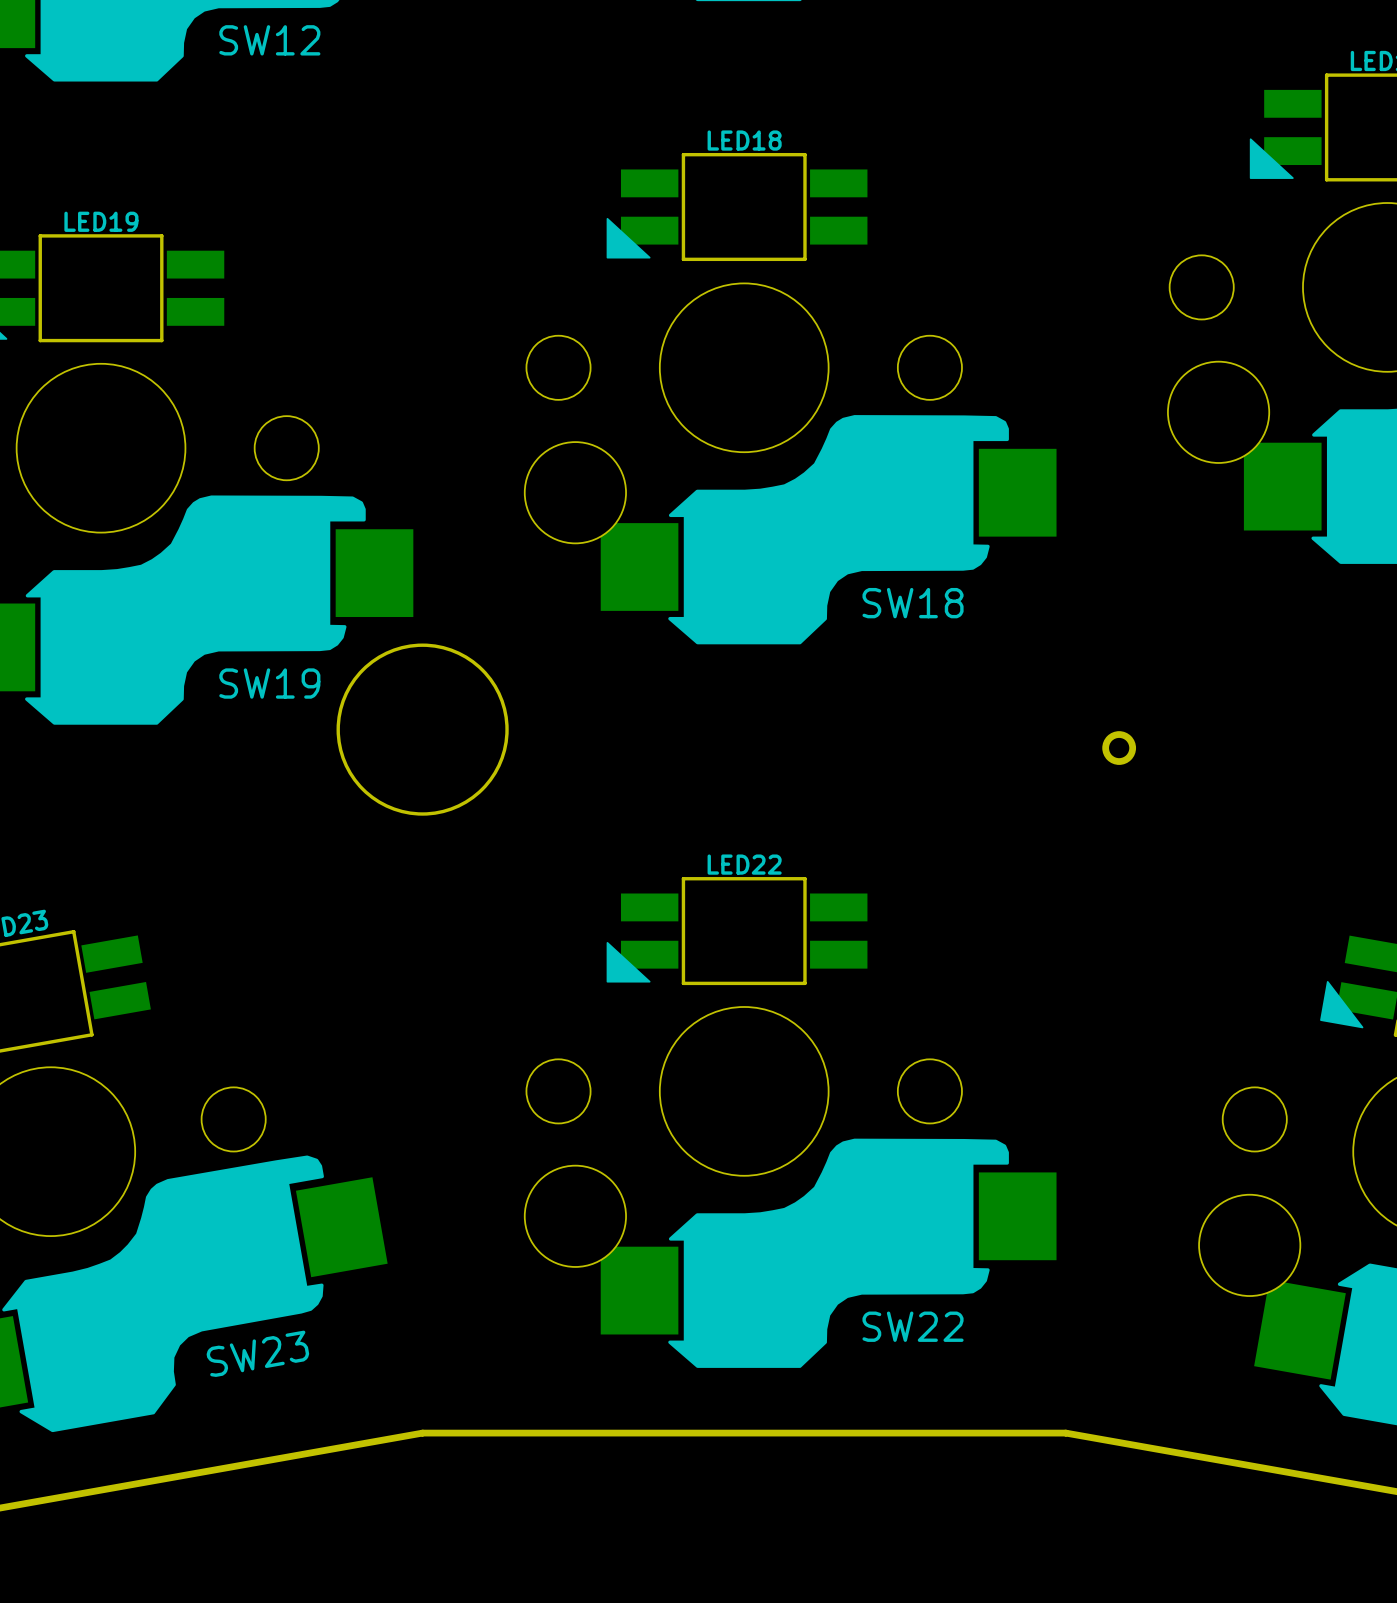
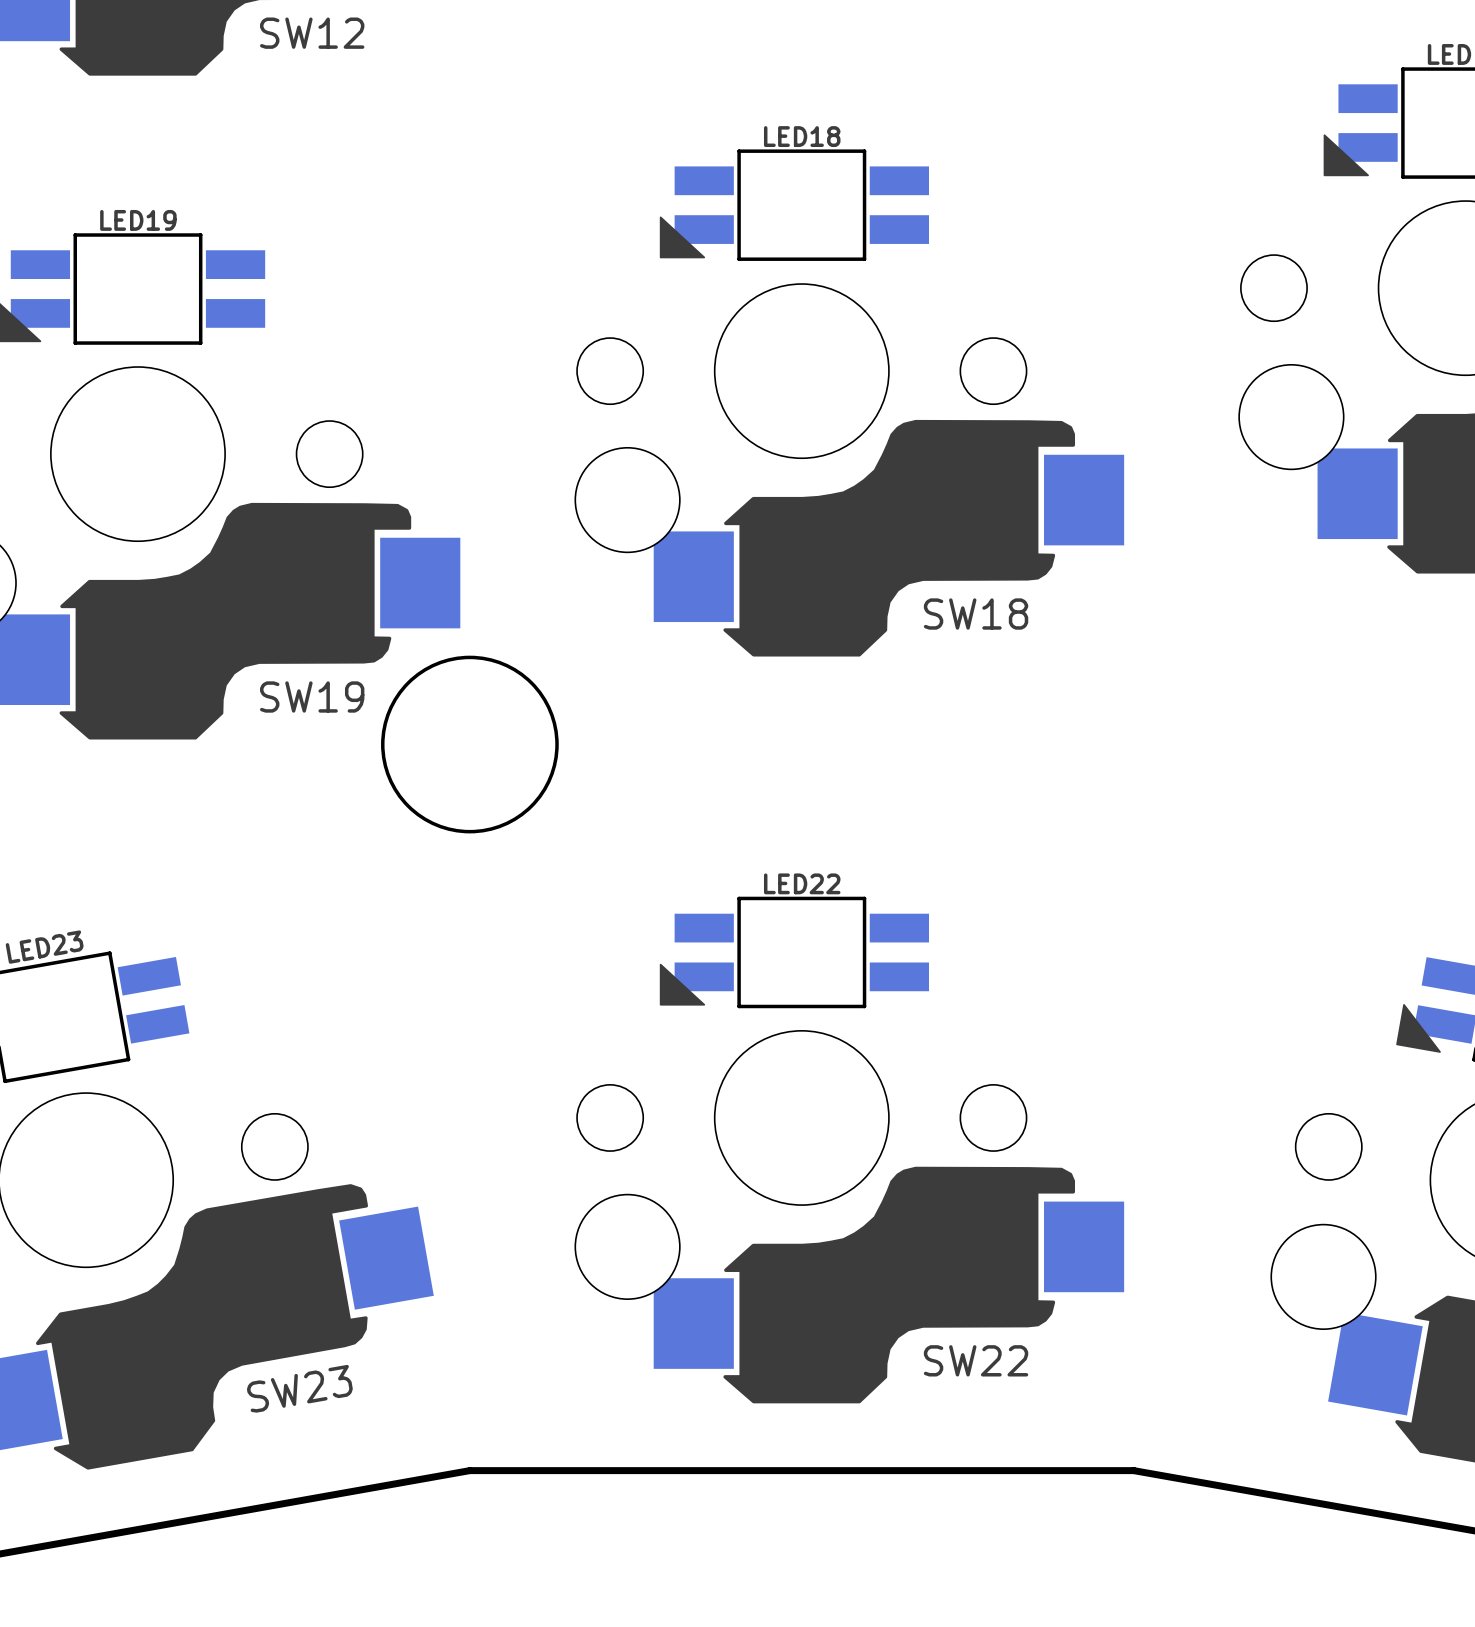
part: (1119, 748) -> none

